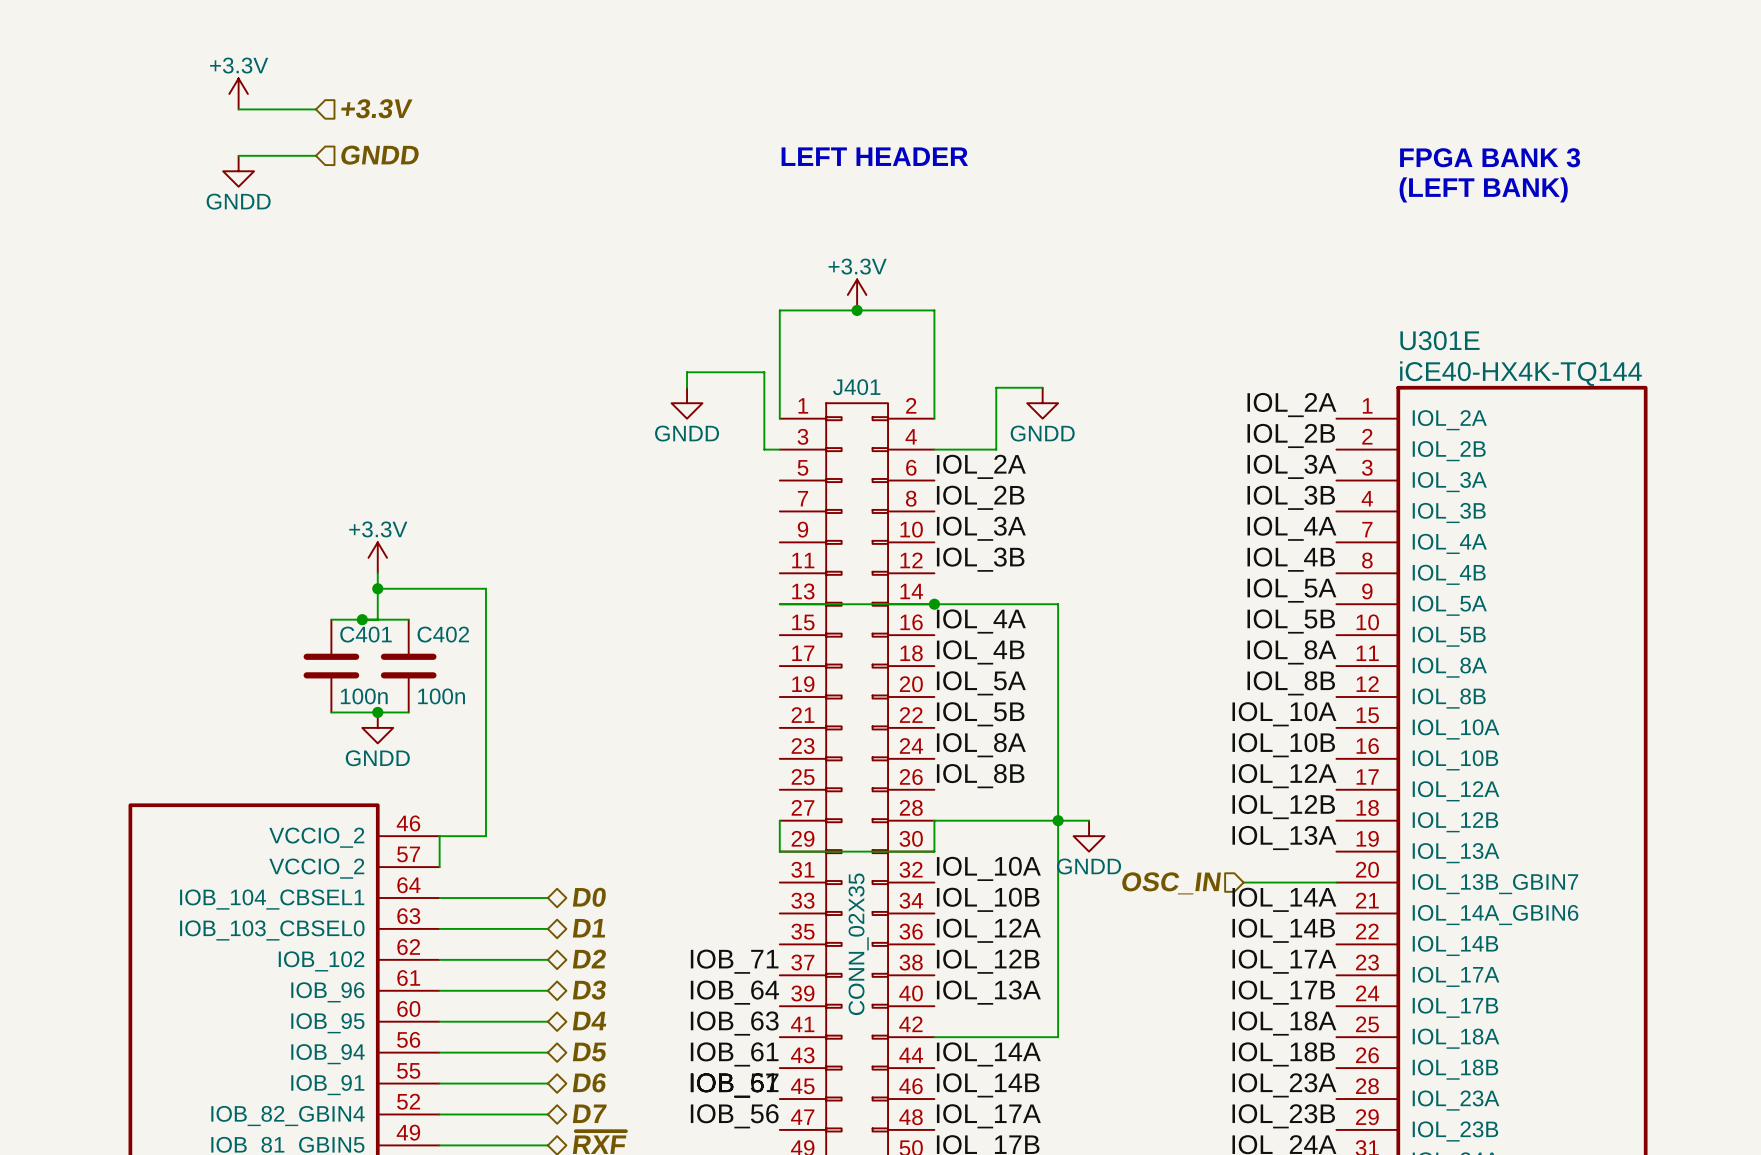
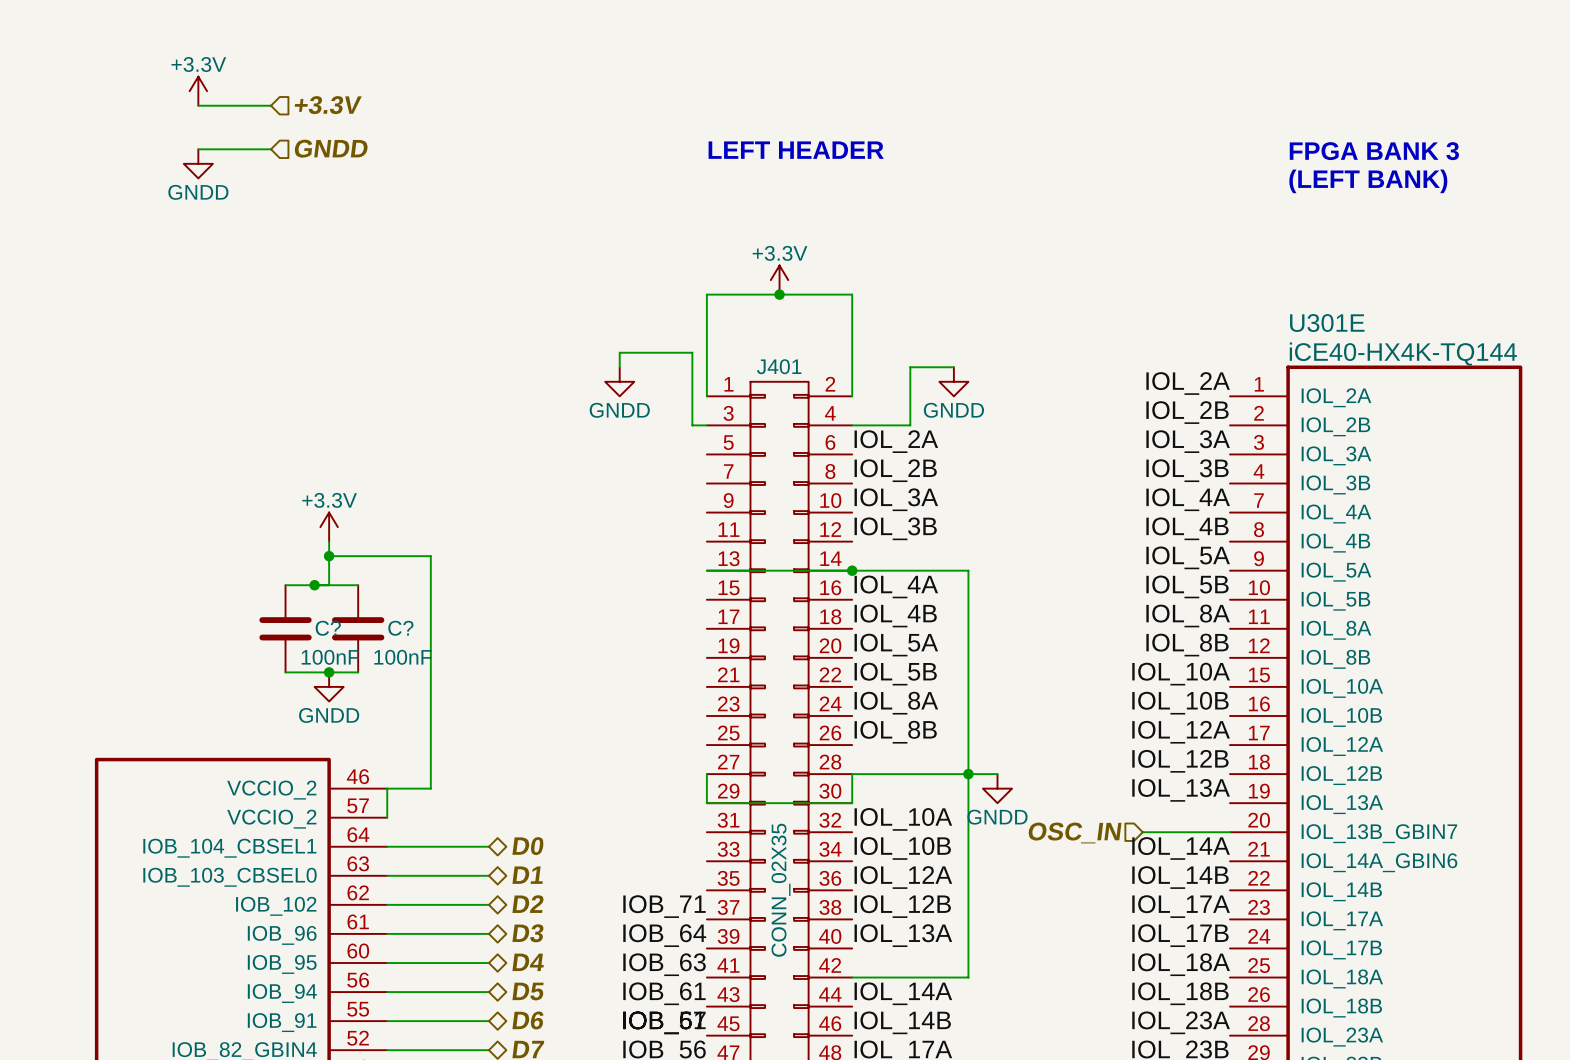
C401 name: C401 (366, 634) -> C? (328, 628)
C402 name: C402 (443, 634) -> C? (400, 628)
C401 value: 100n (364, 696) -> 100nF (330, 657)
C402 value: 100n (441, 696) -> 100nF (403, 657)

